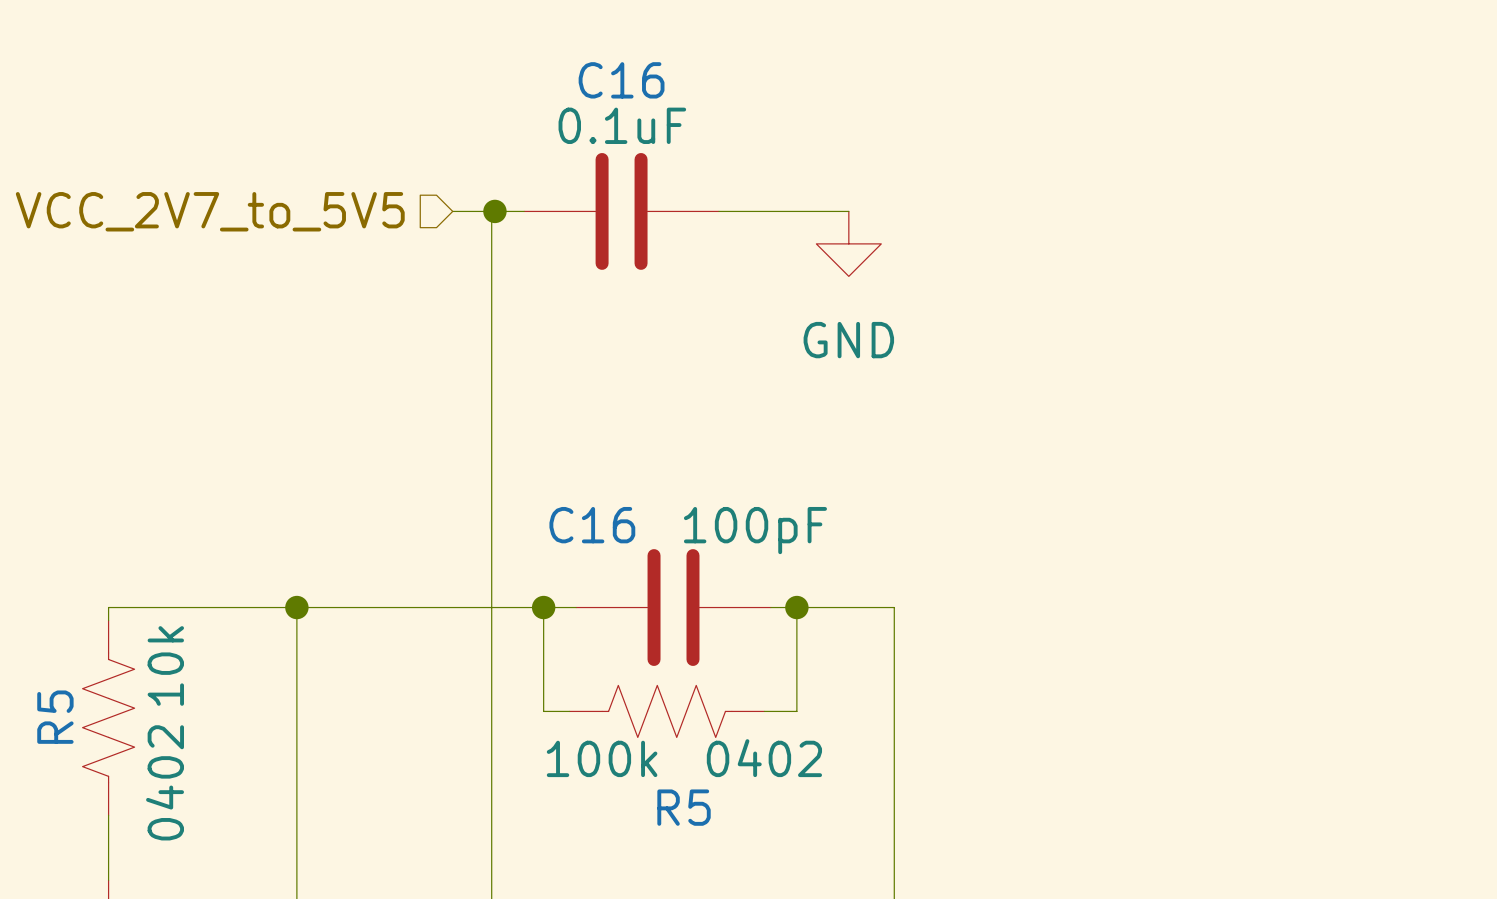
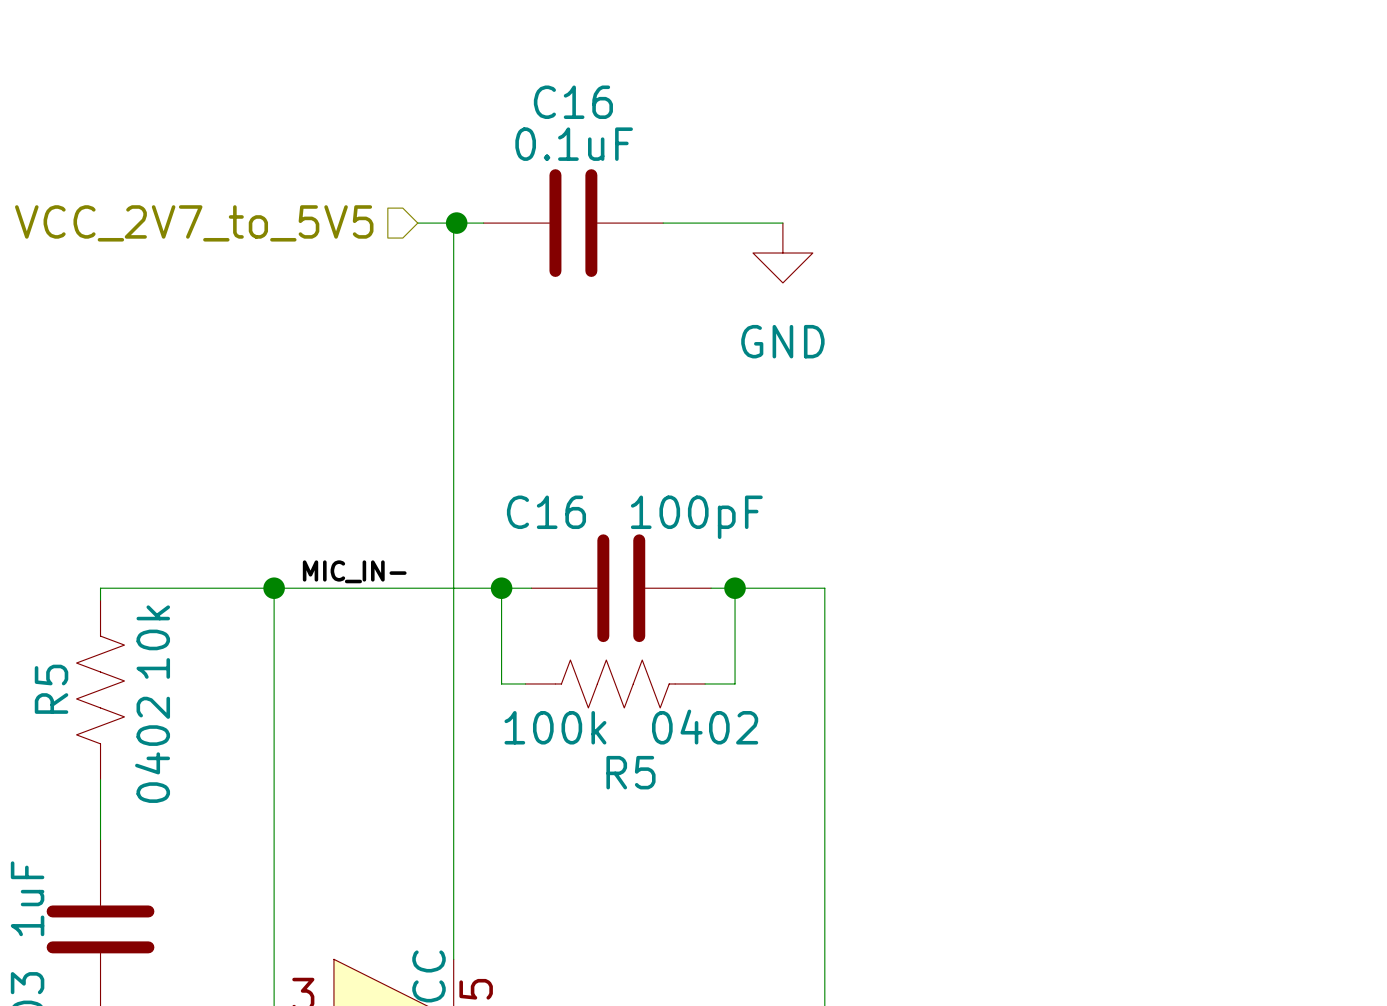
label: none -> MIC_IN- (354, 571)

